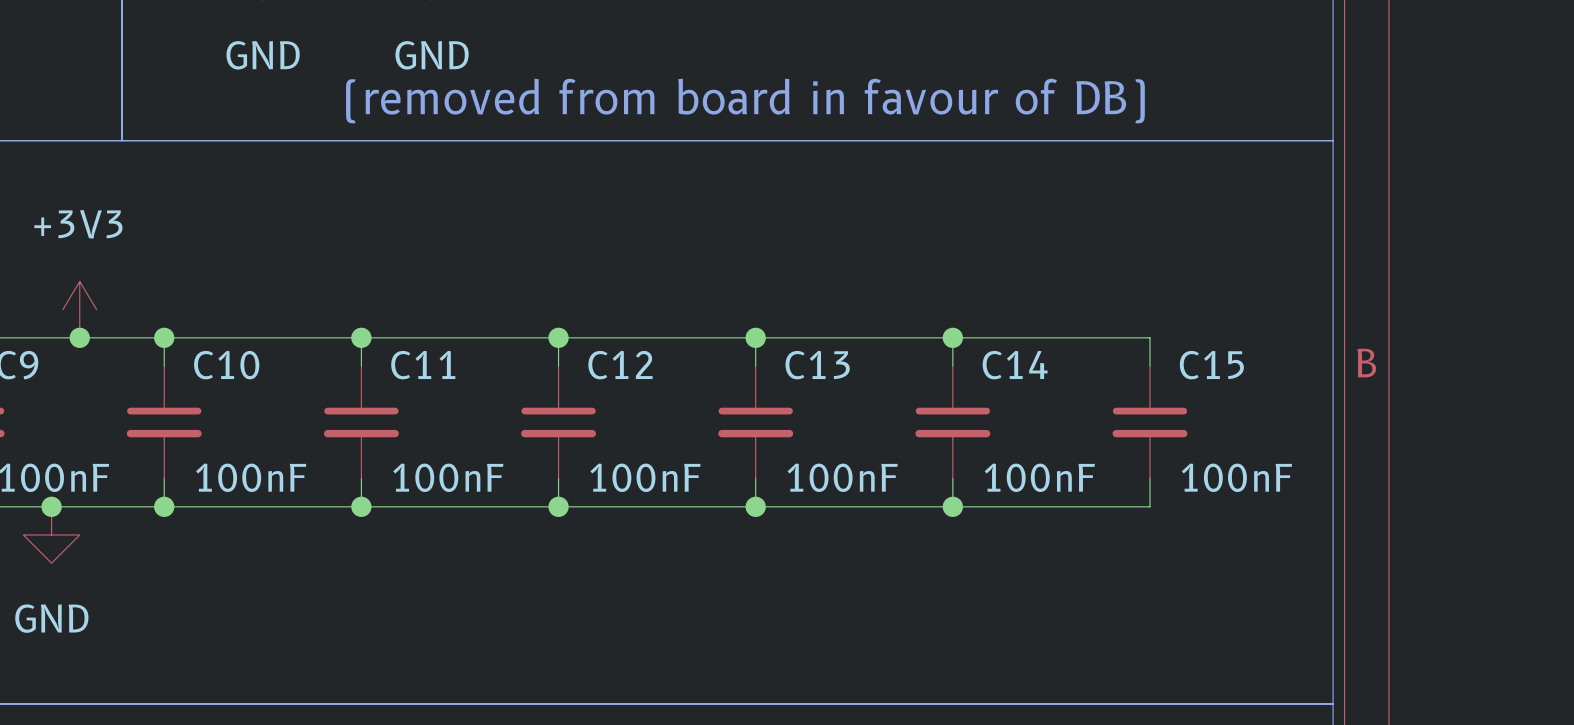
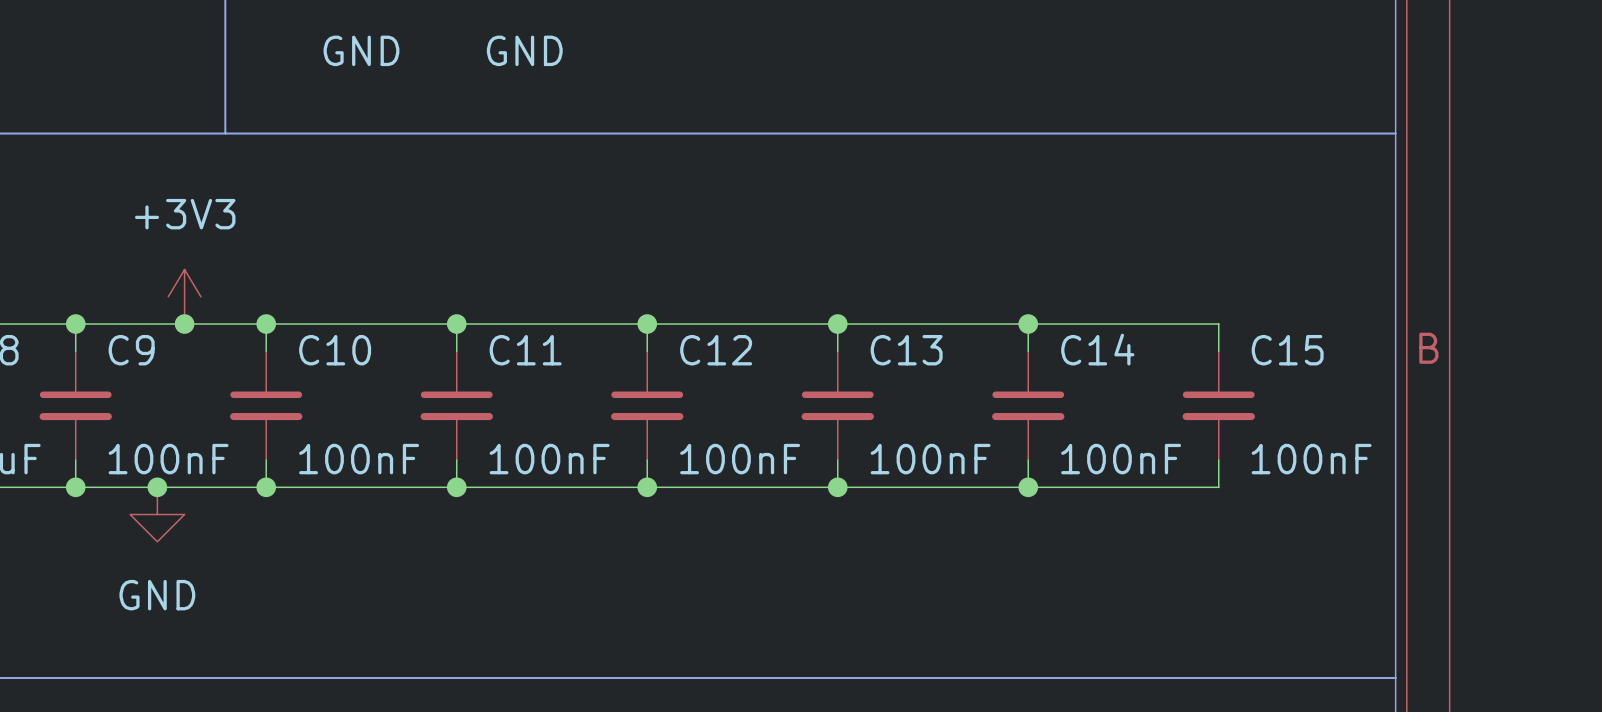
text: (removed from board in favour of DB) (745, 101) -> none

